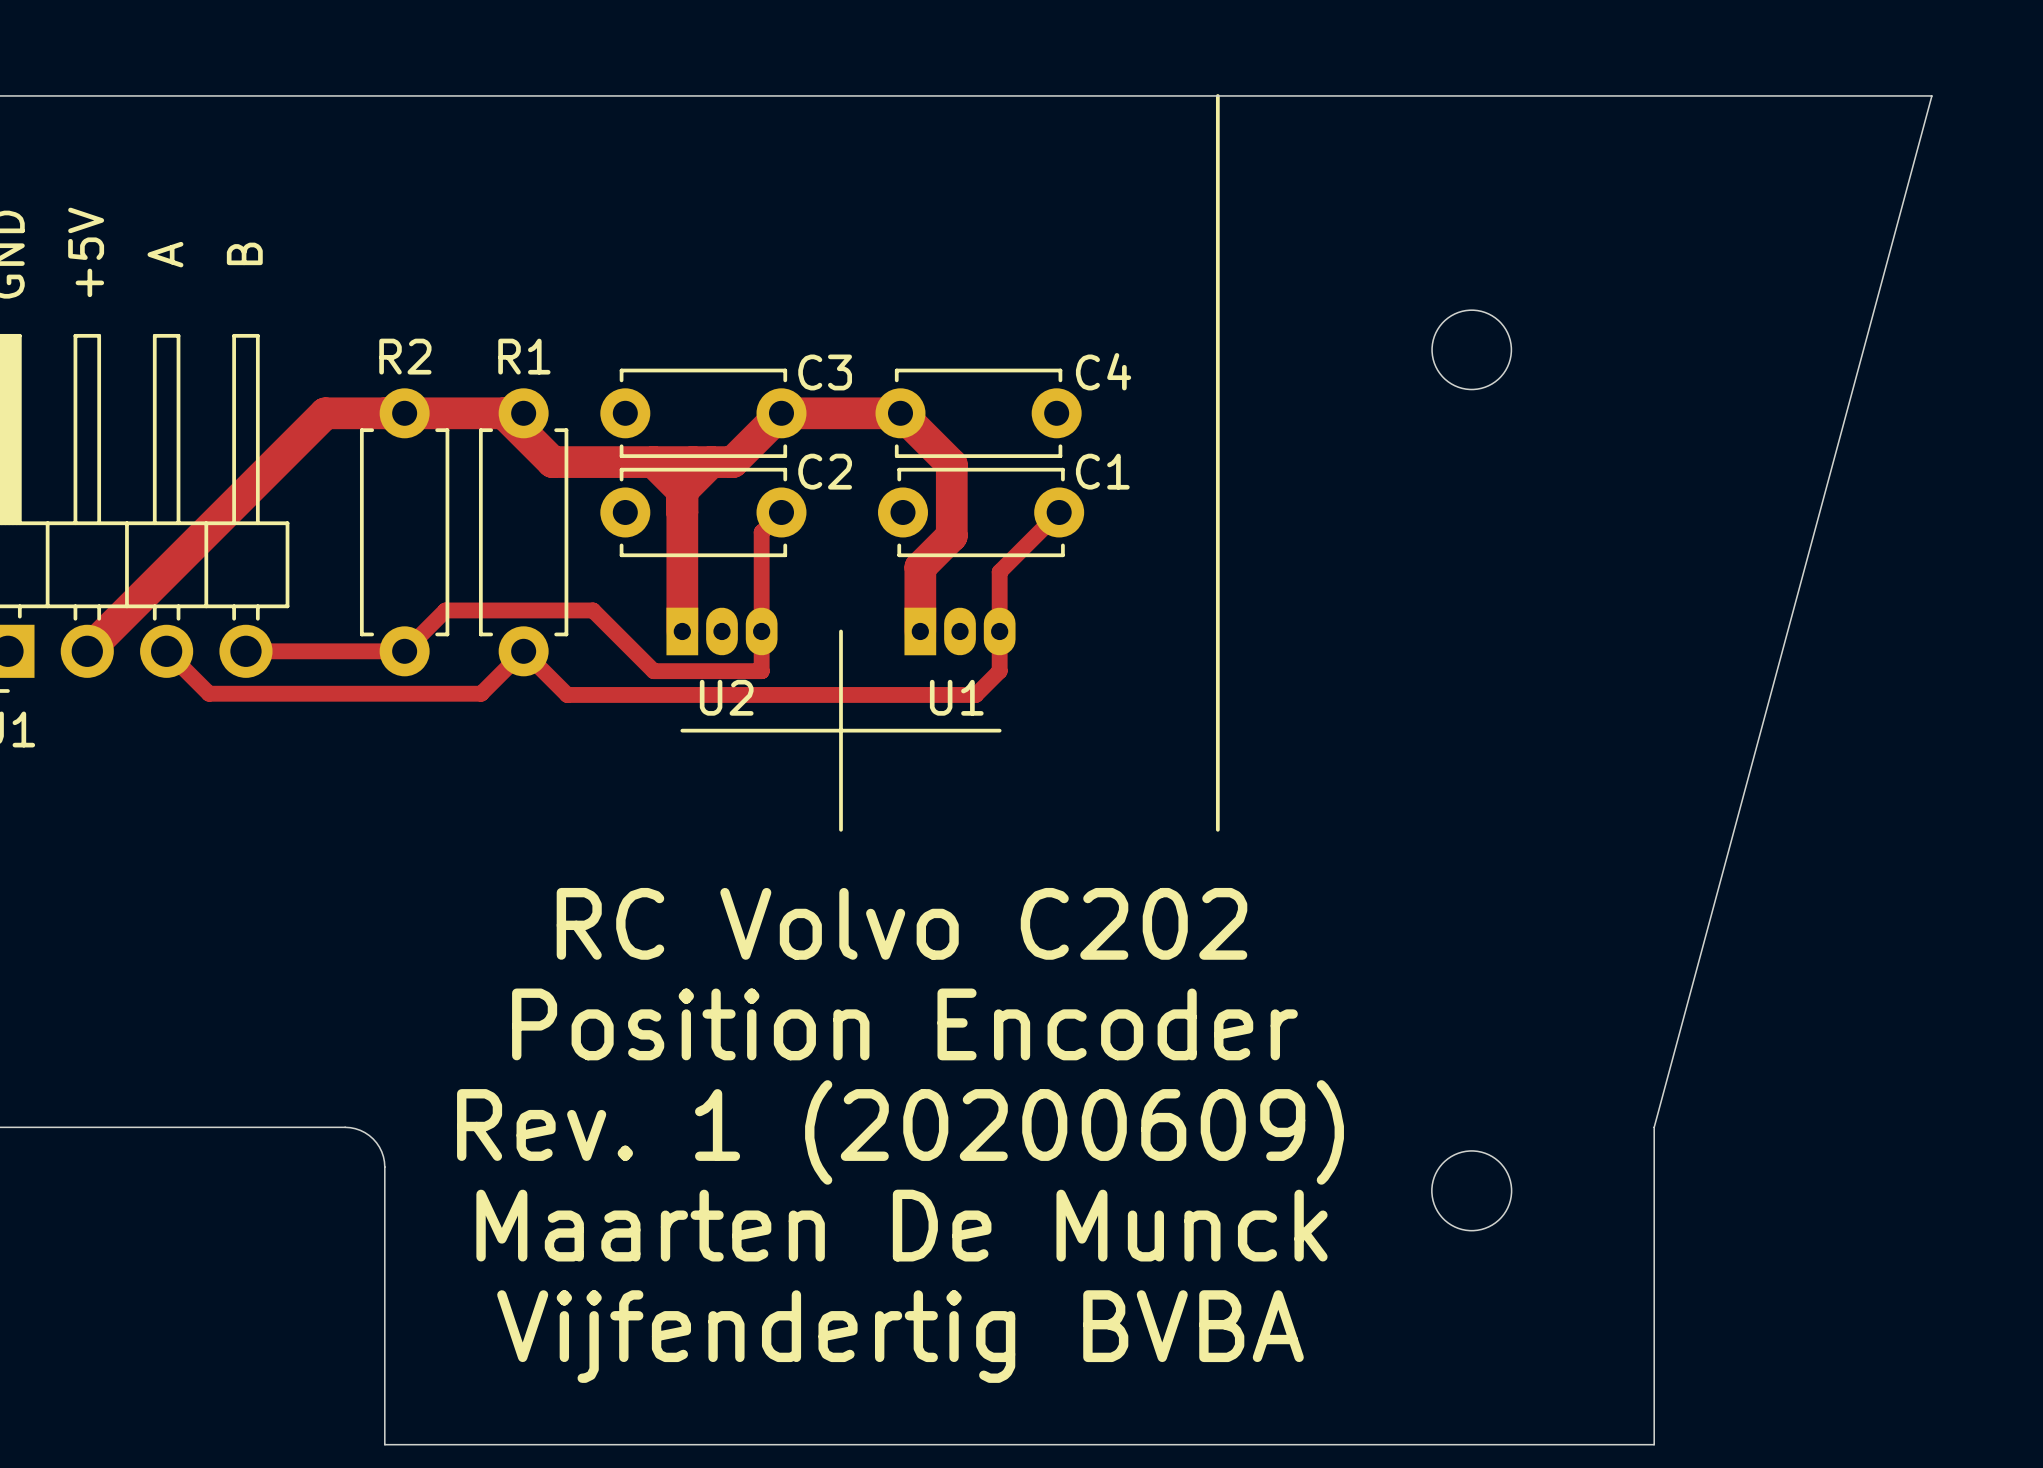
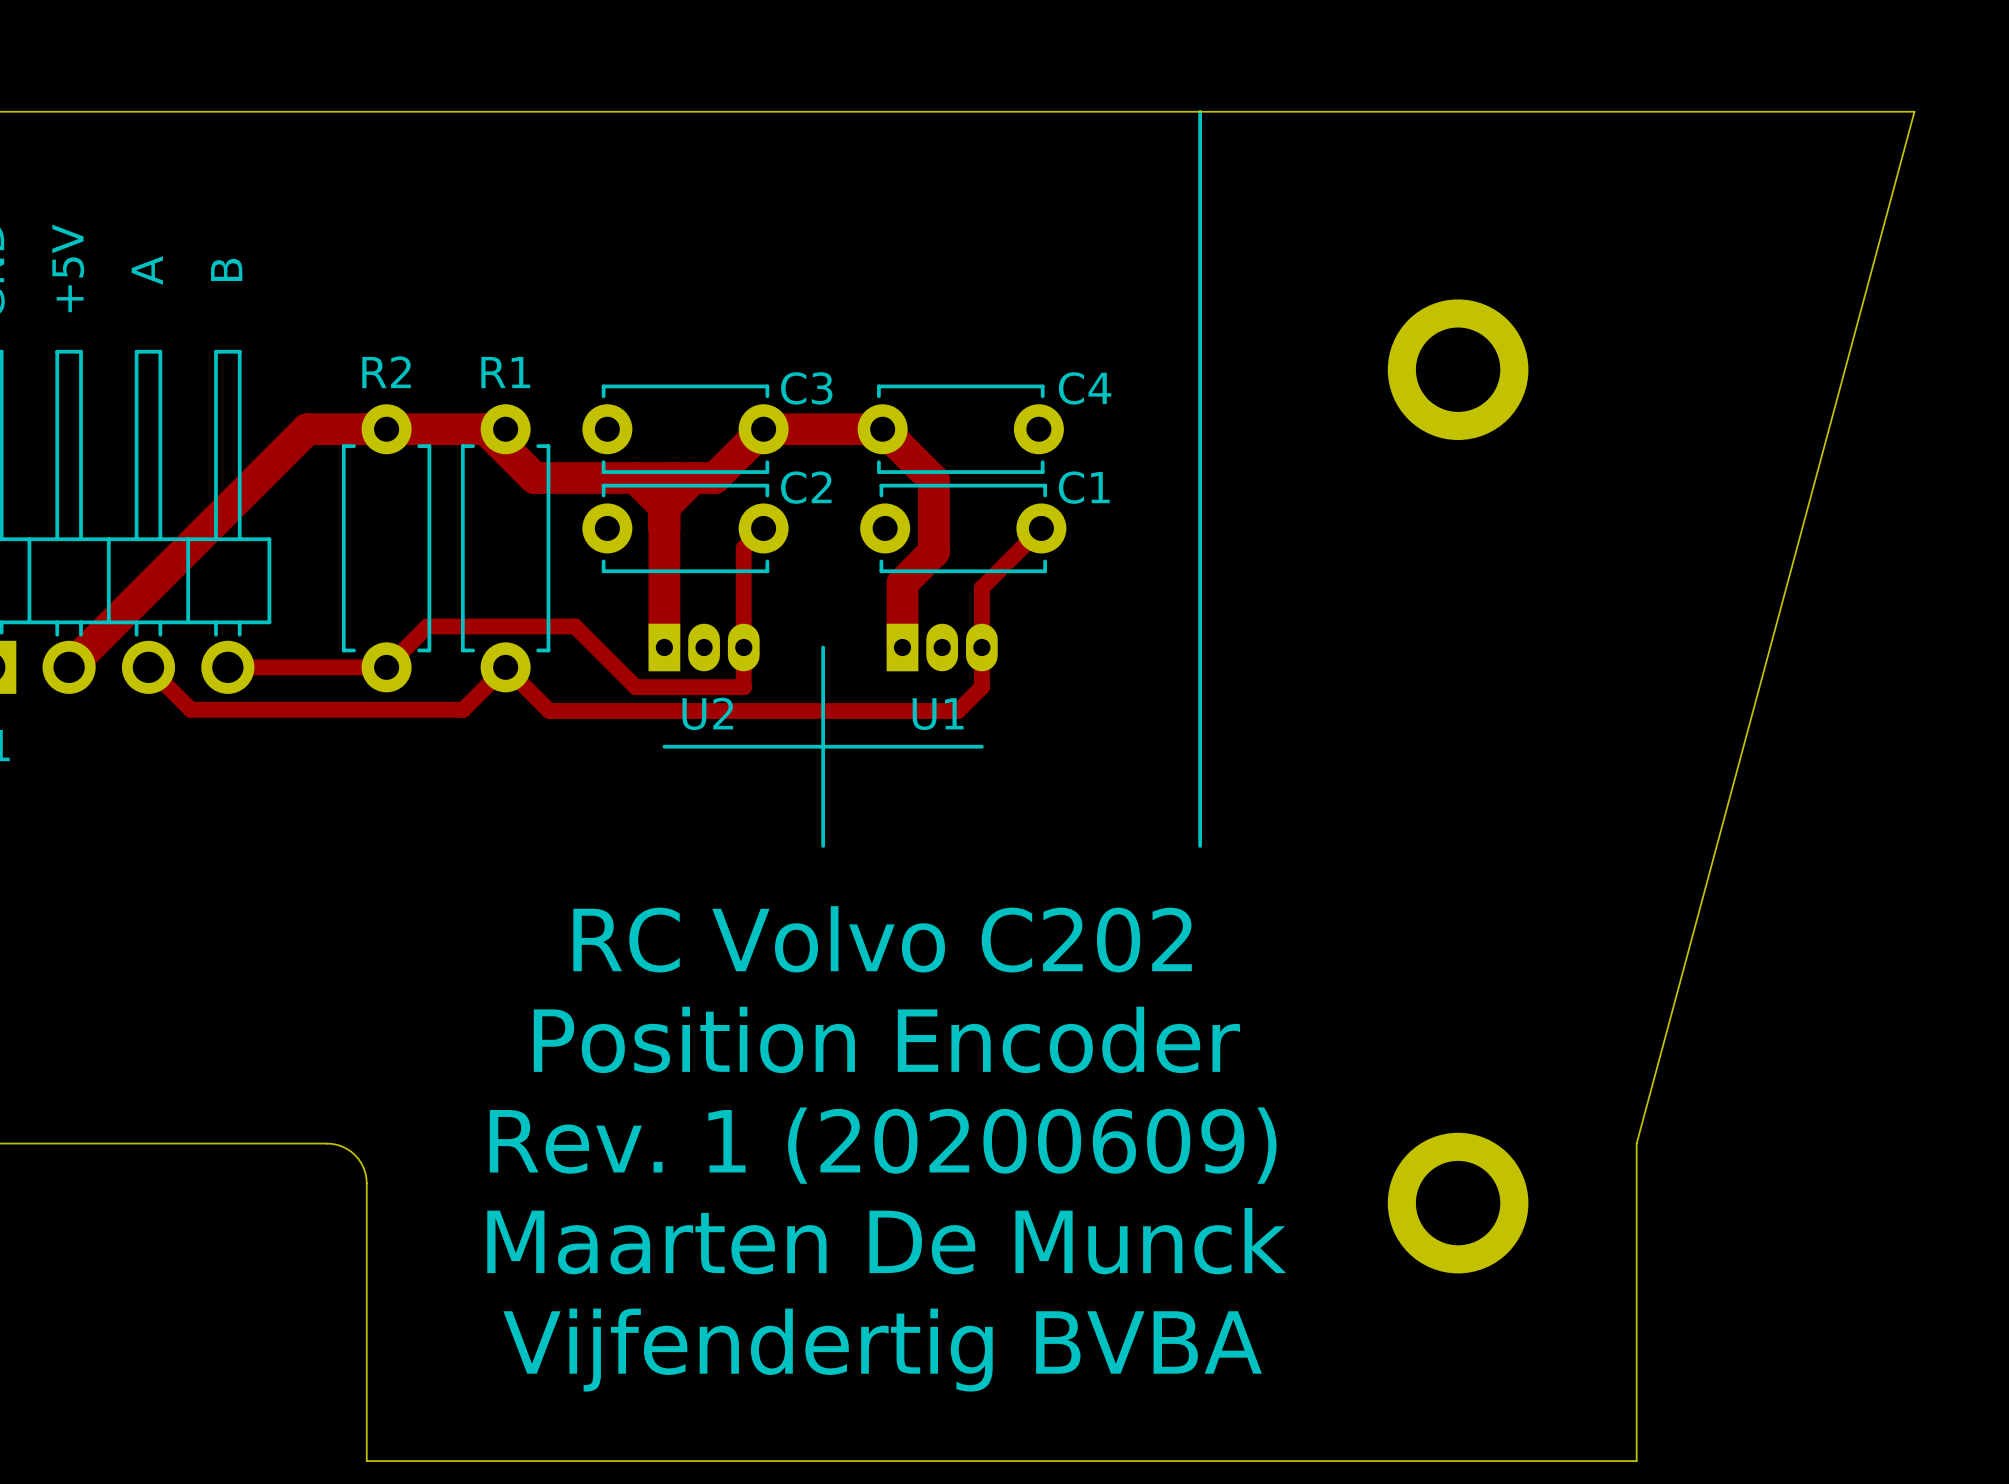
round board edge: [1431, 309, 1513, 391] -> none
part: none -> (1458, 369)
round board edge: [1431, 1150, 1513, 1232] -> none
part: none -> (1458, 1203)

